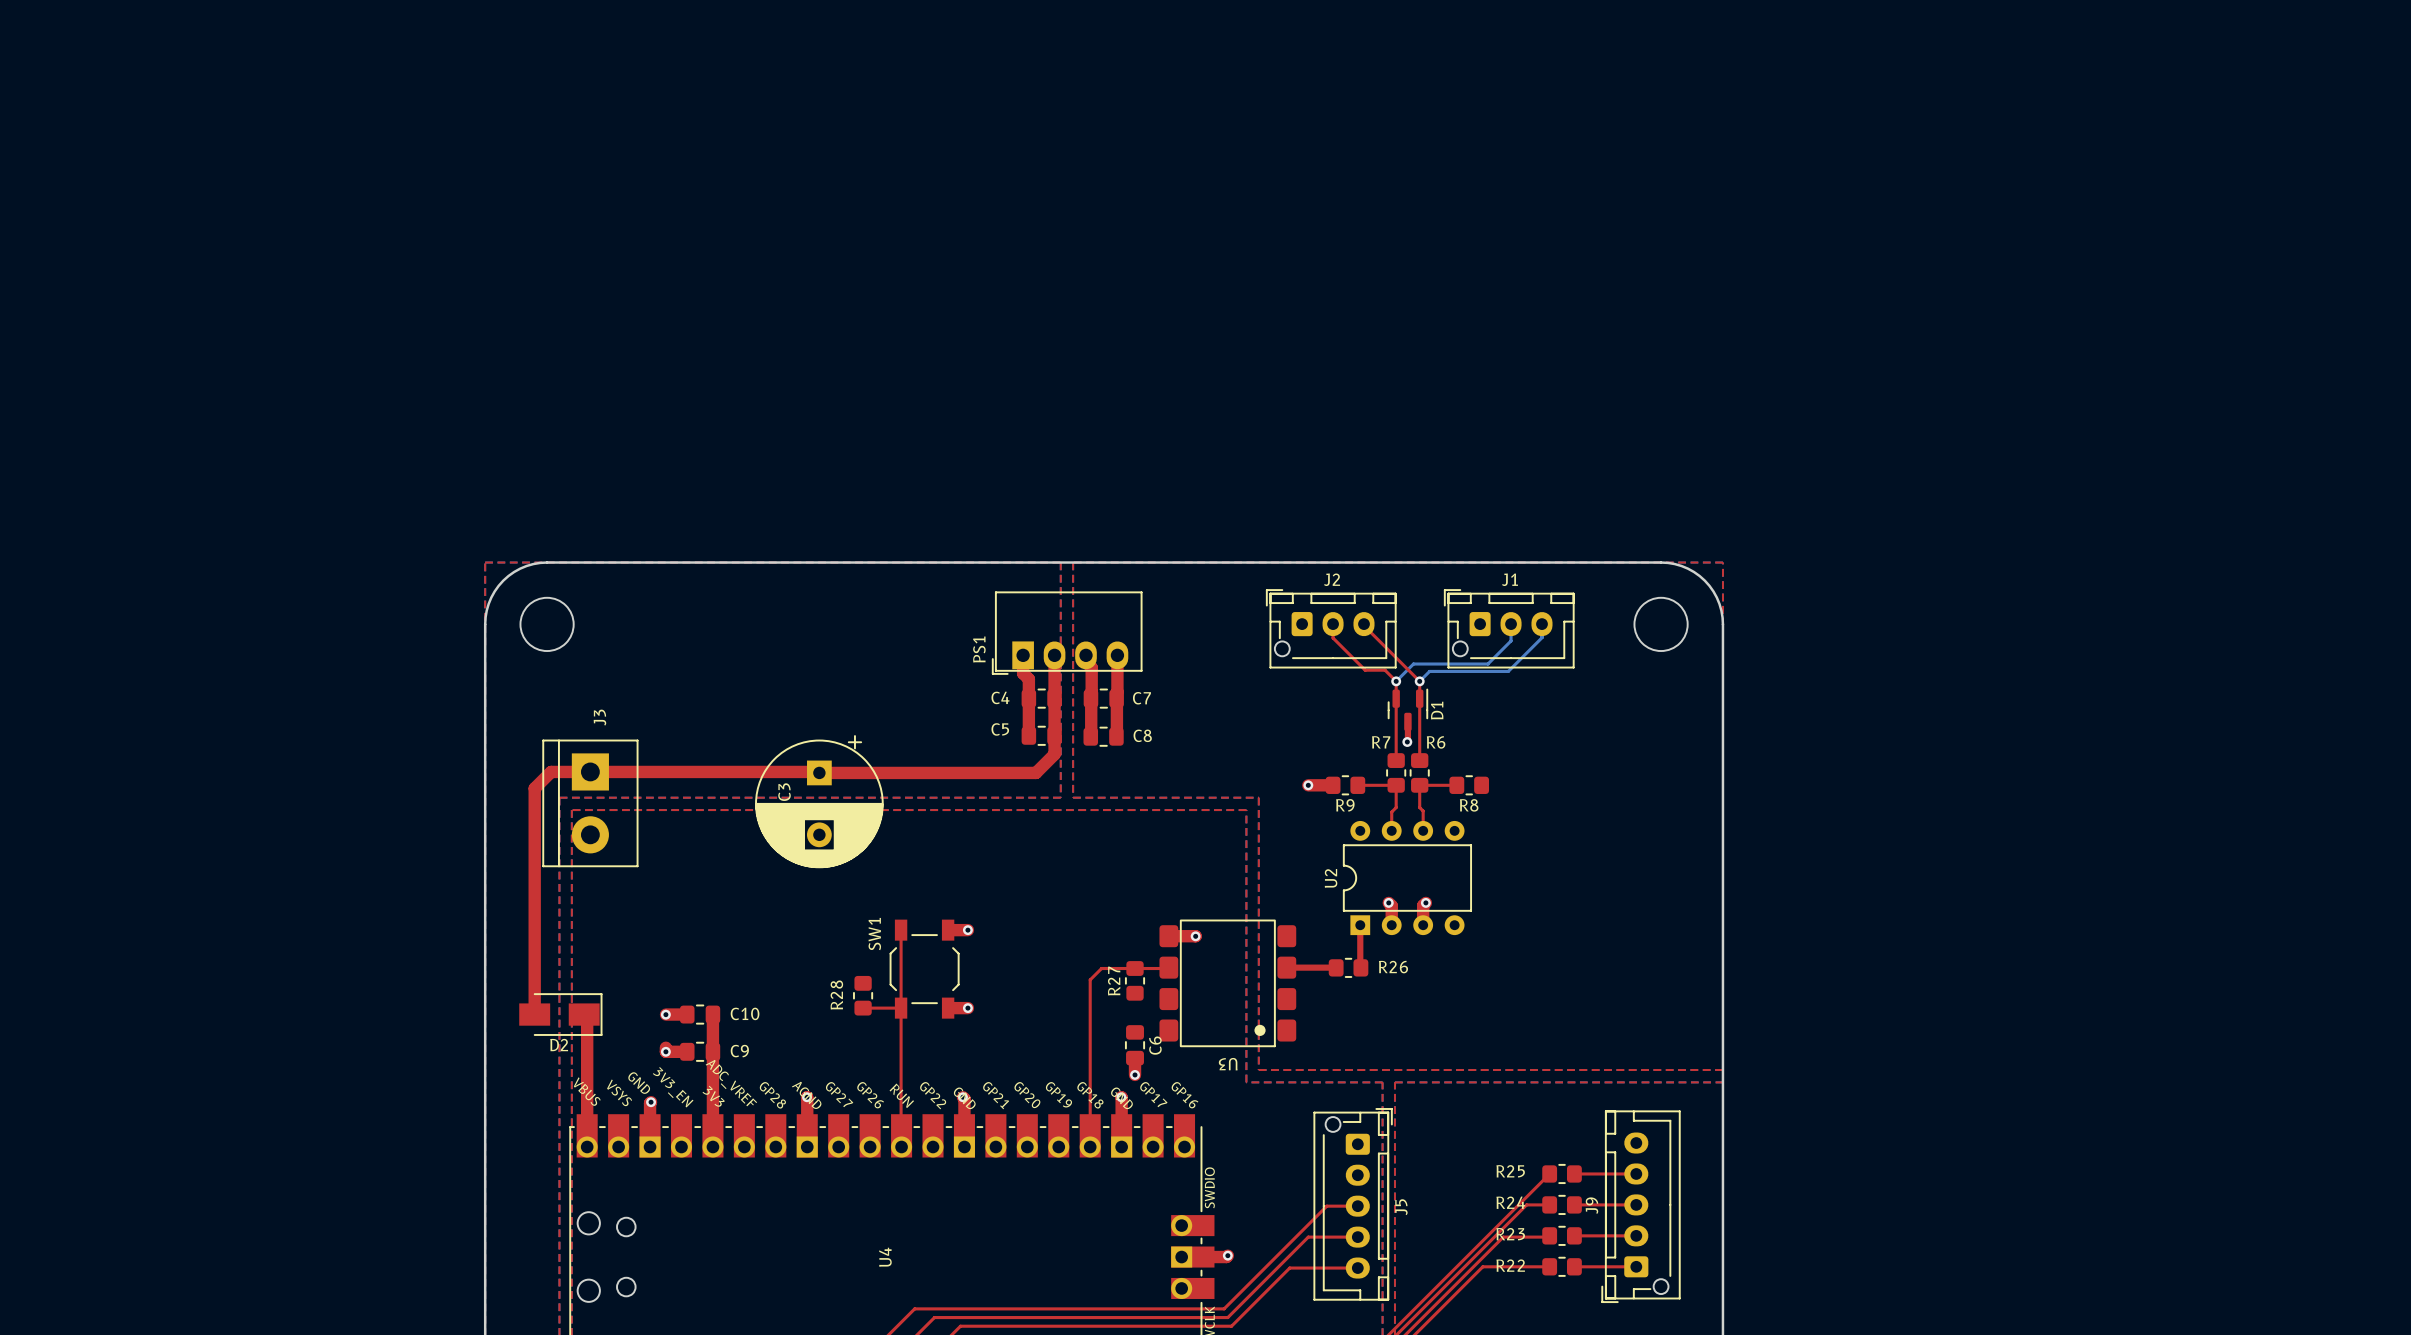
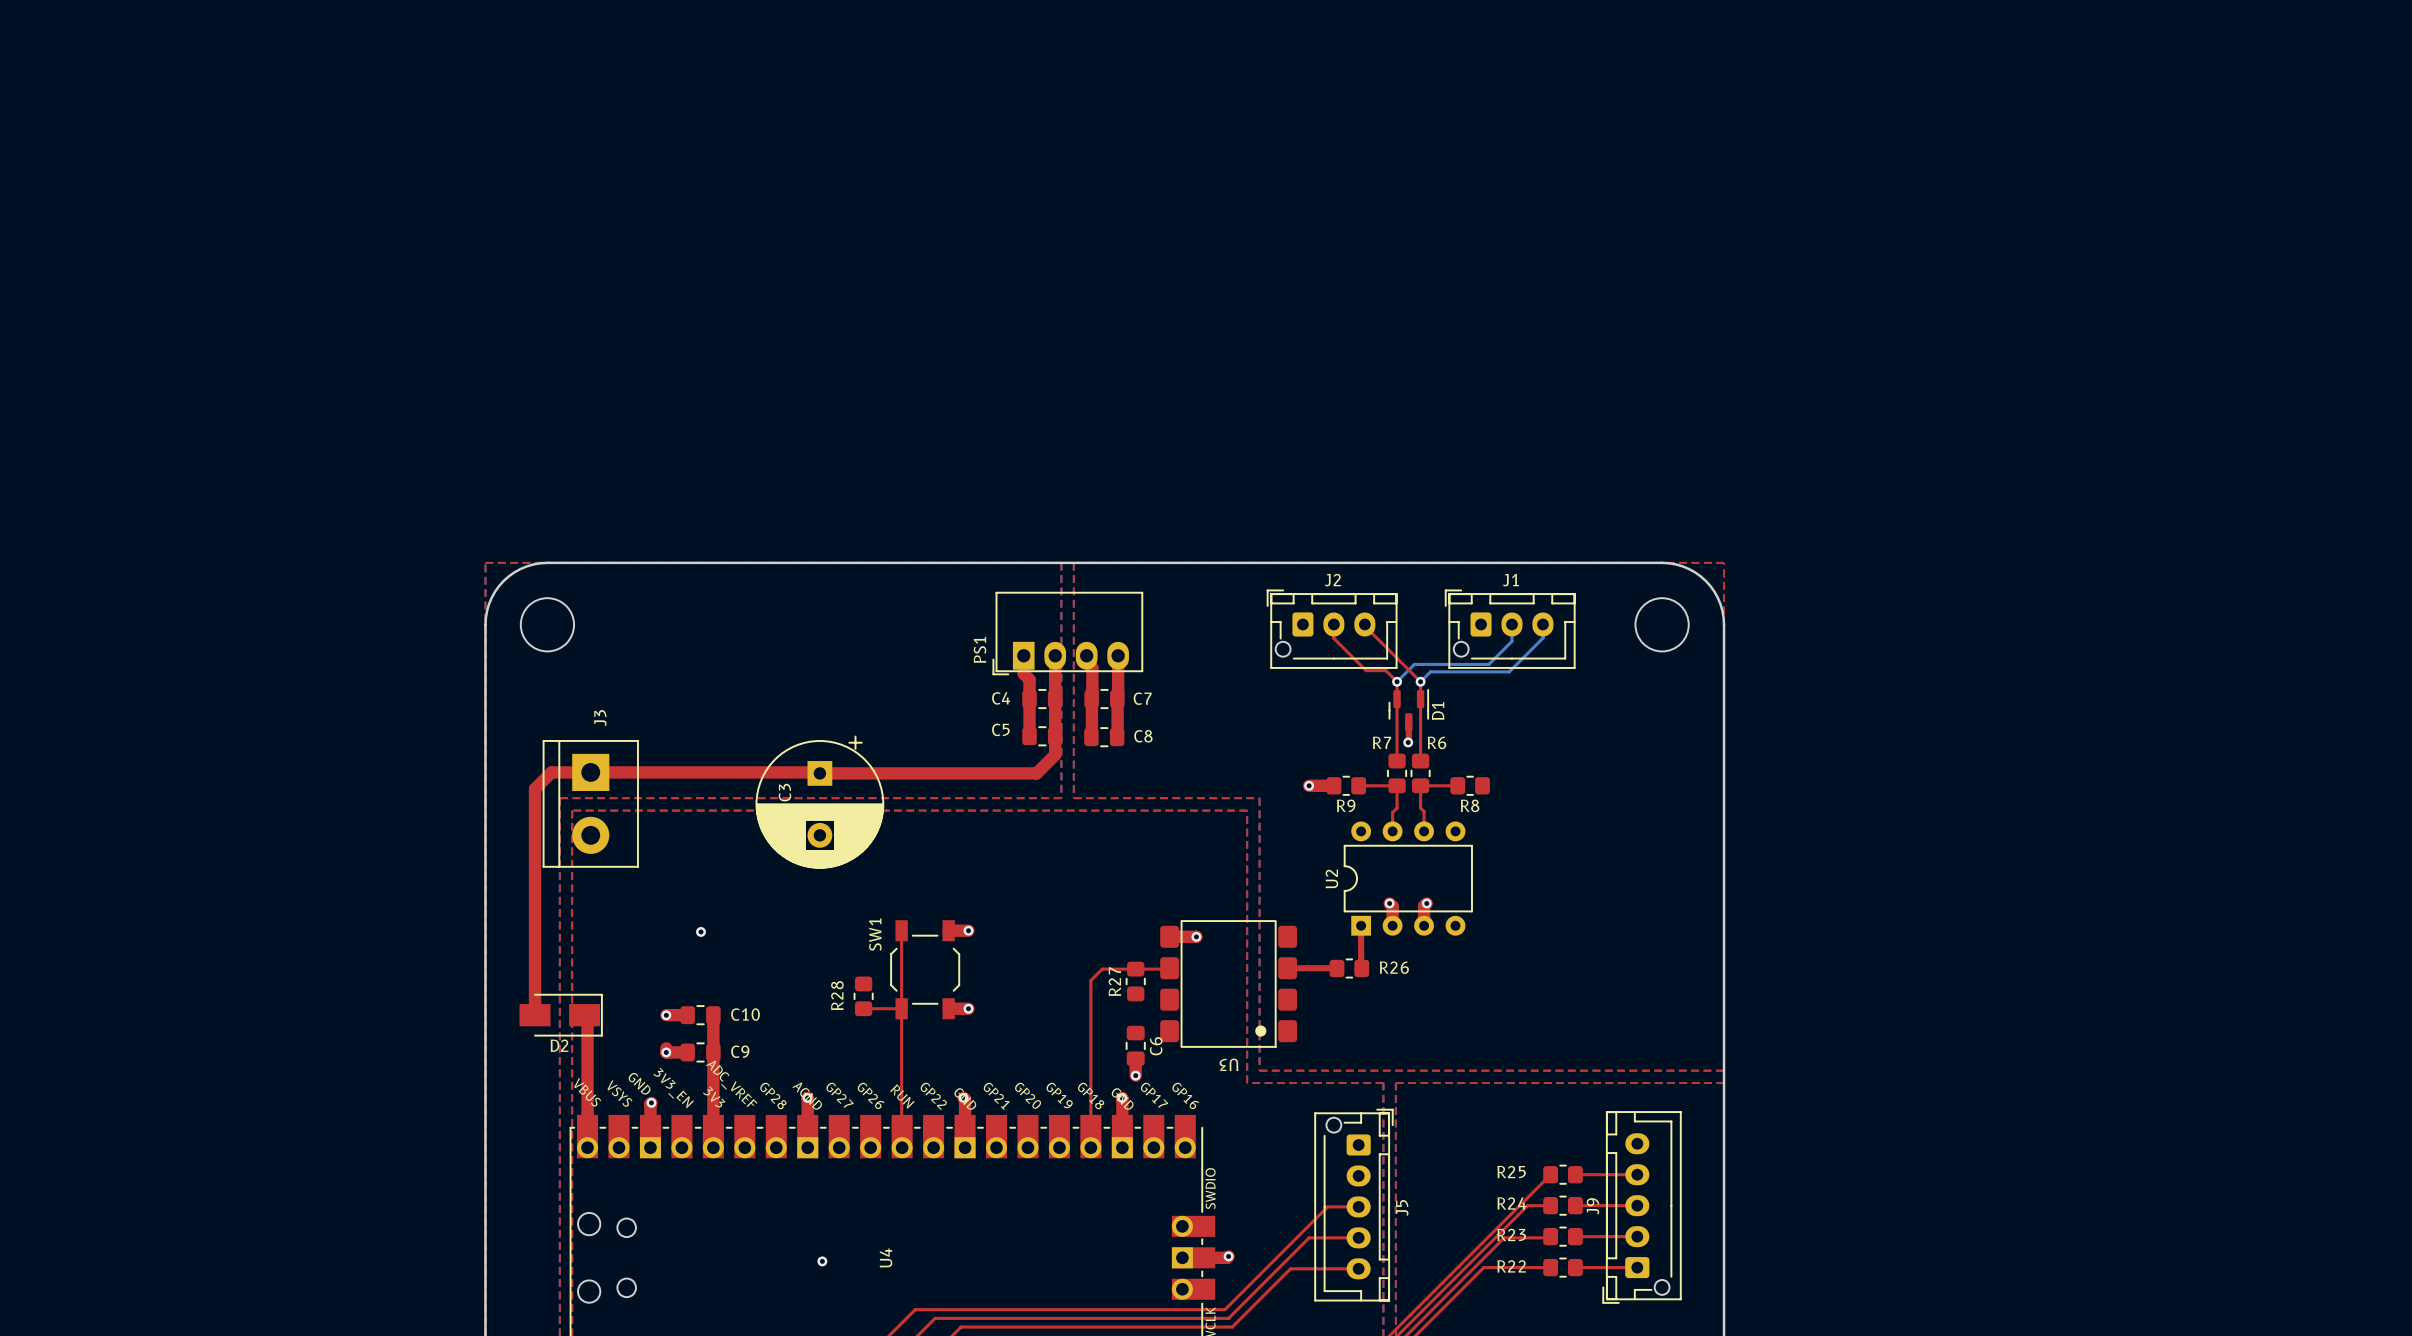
via: none -> (700, 931)
via: none -> (822, 1261)

